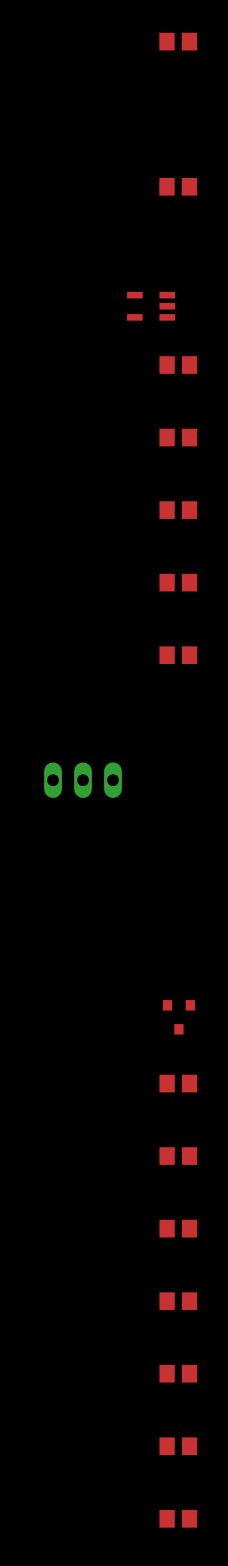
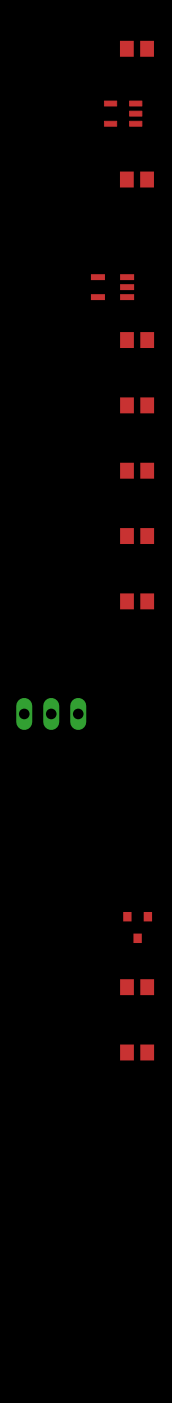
part: none -> (123, 113)
part: (178, 1228) -> none
part: (178, 1301) -> none
part: (178, 1373) -> none
part: (178, 1446) -> none
part: (178, 1518) -> none

